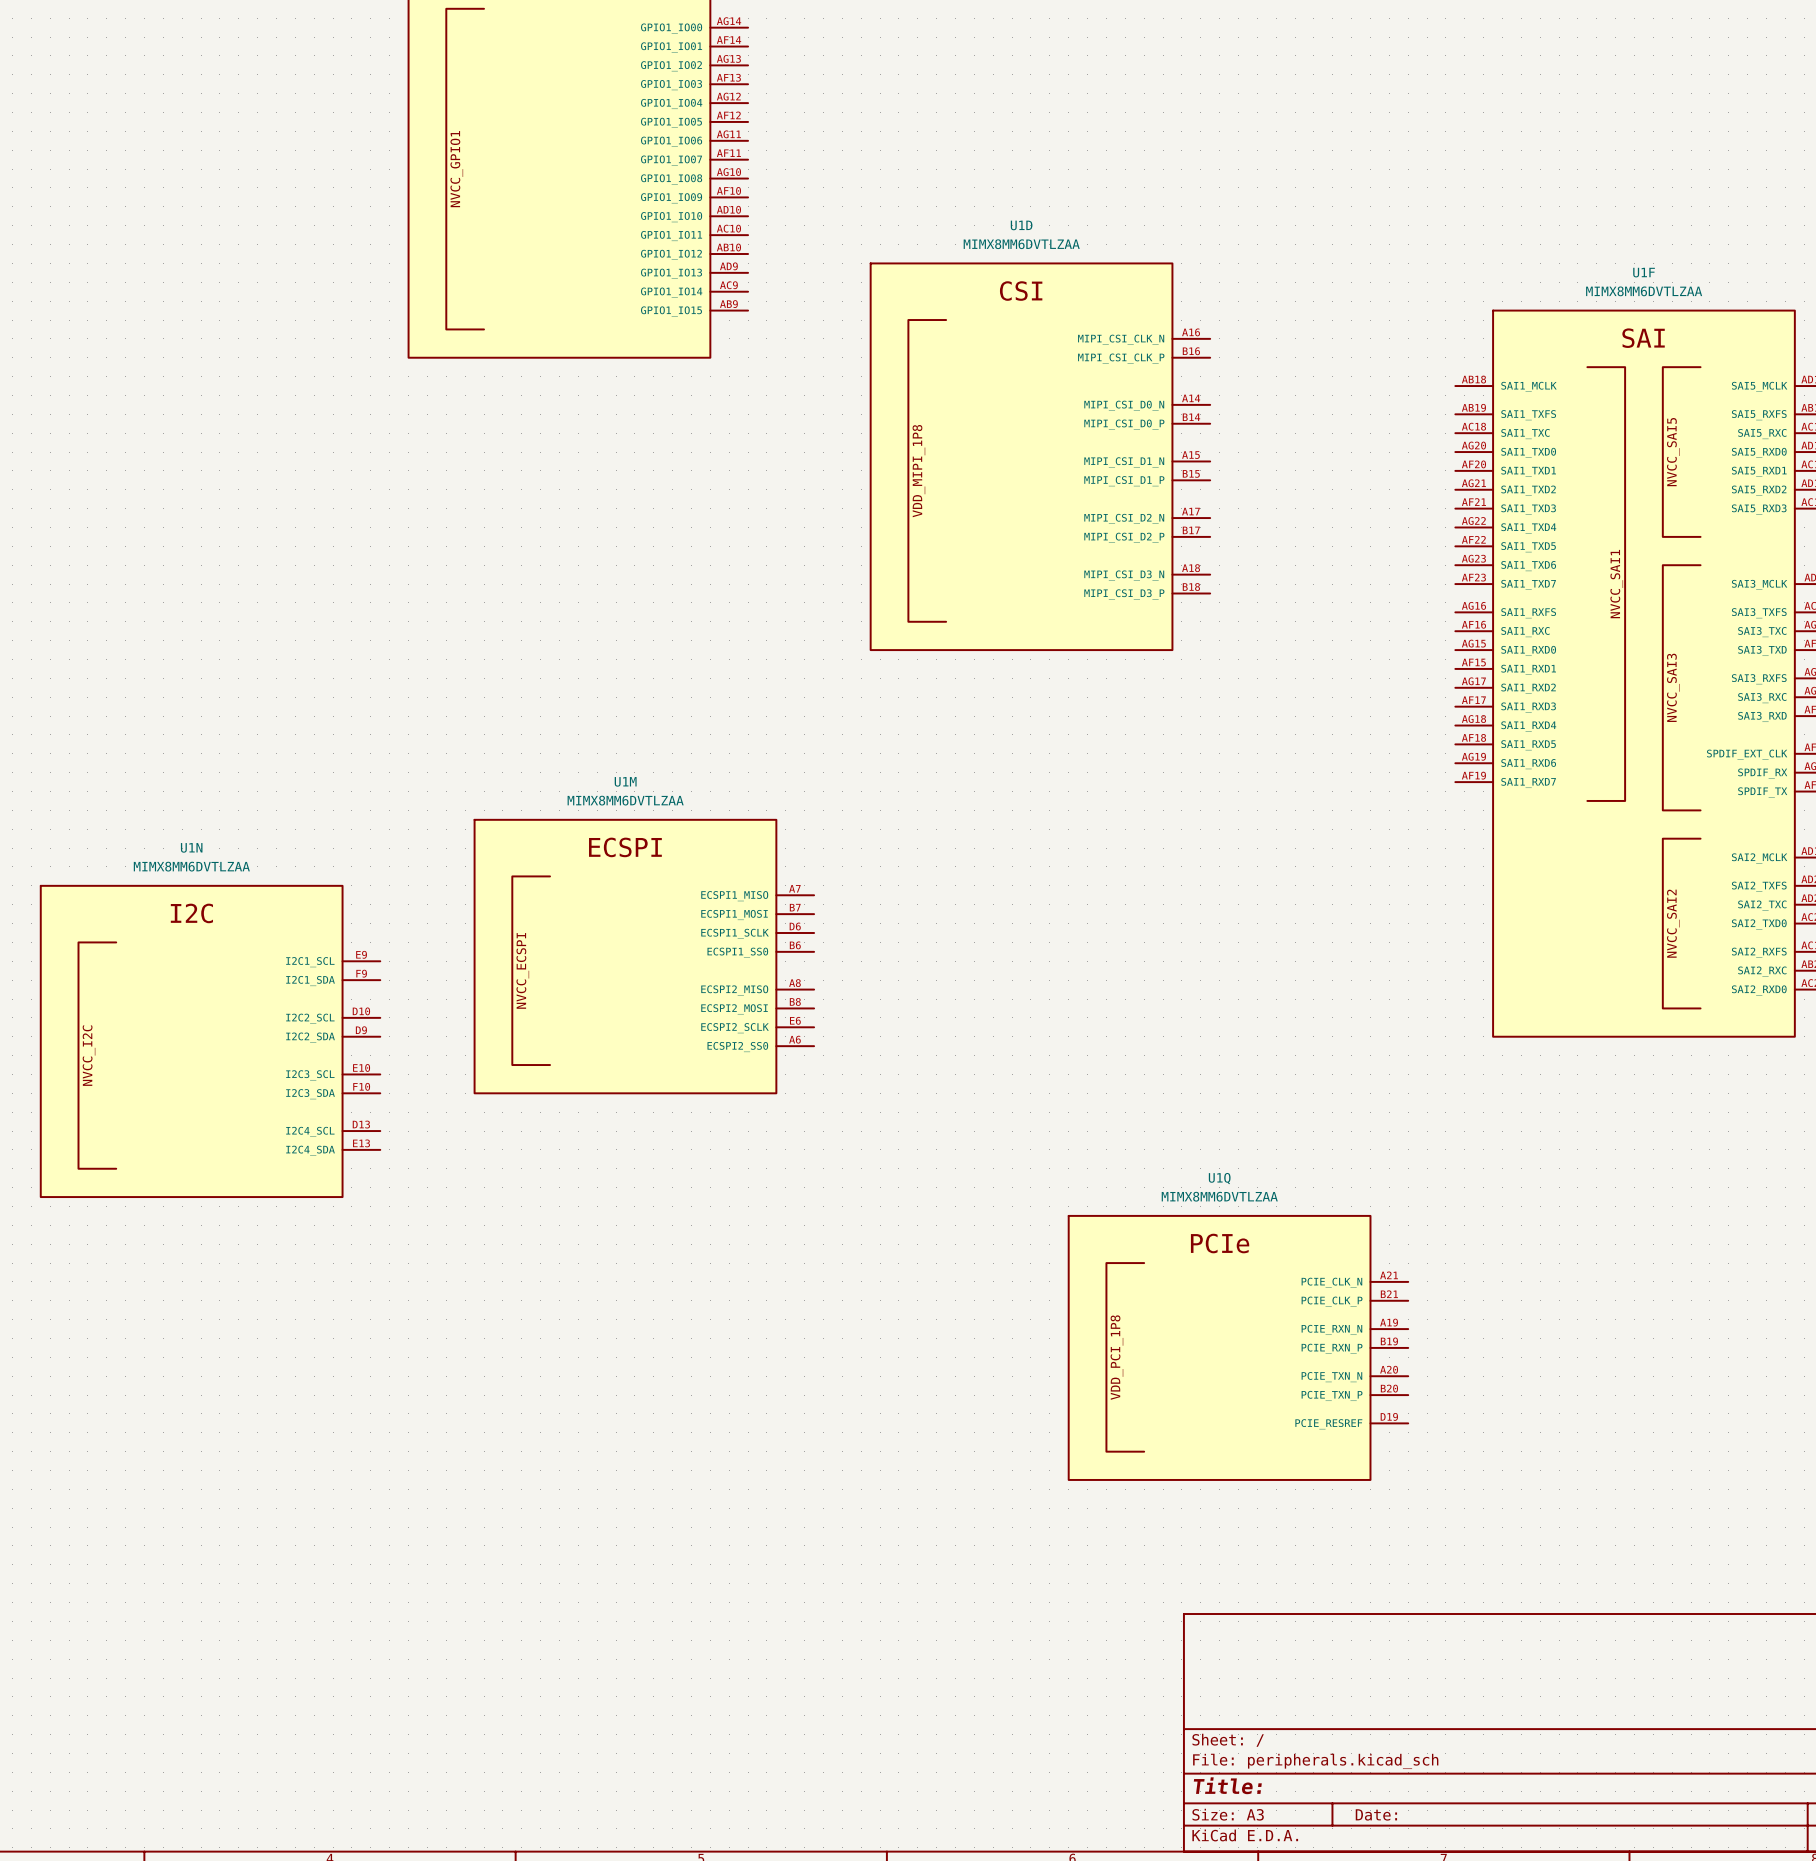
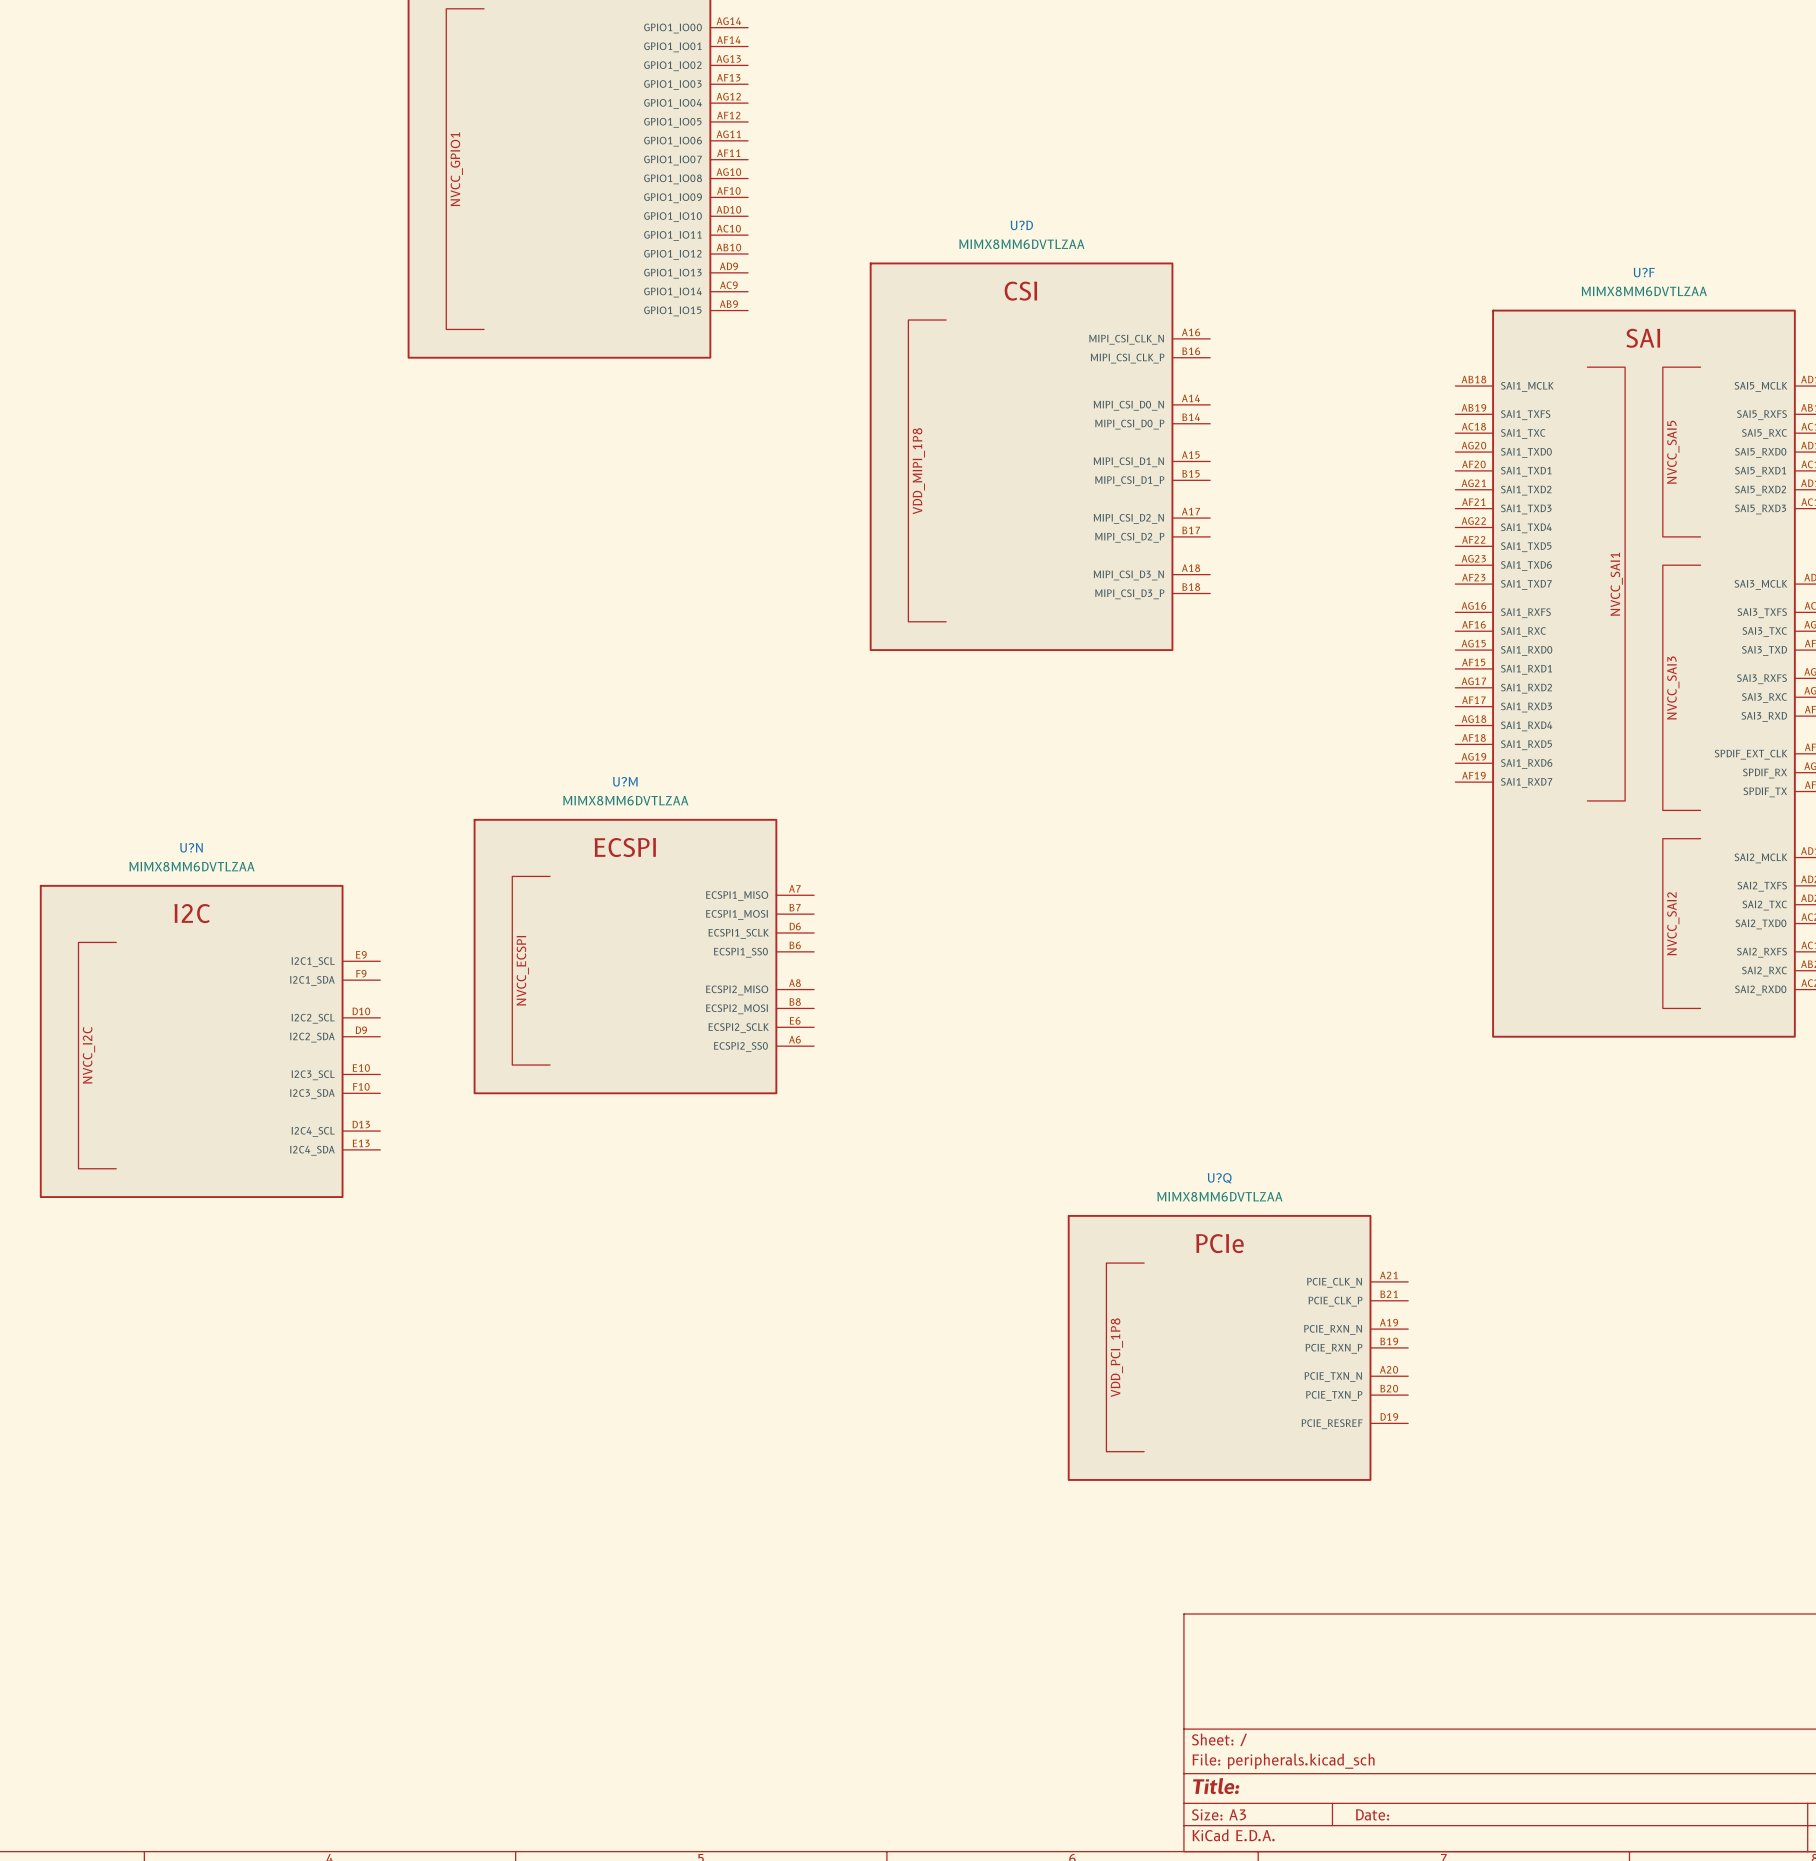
U1D name: U1D (1021, 225) -> U?D (1021, 225)
U1F name: U1F (1644, 272) -> U?F (1644, 272)
U1M name: U1M (625, 781) -> U?M (625, 781)
U1N name: U1N (191, 847) -> U?N (191, 847)
U1Q name: U1Q (1219, 1178) -> U?Q (1219, 1178)

